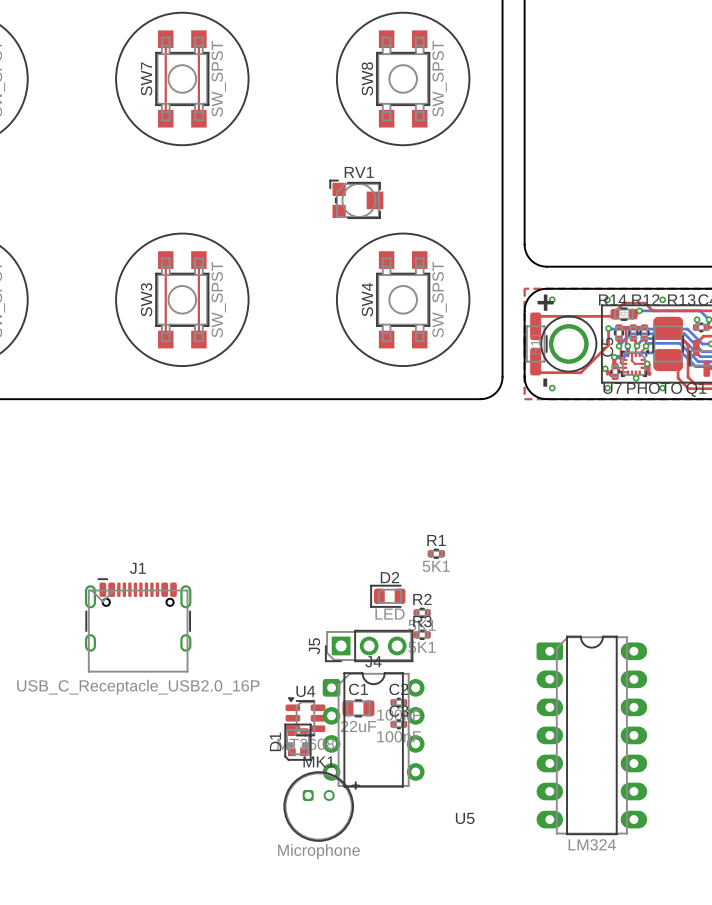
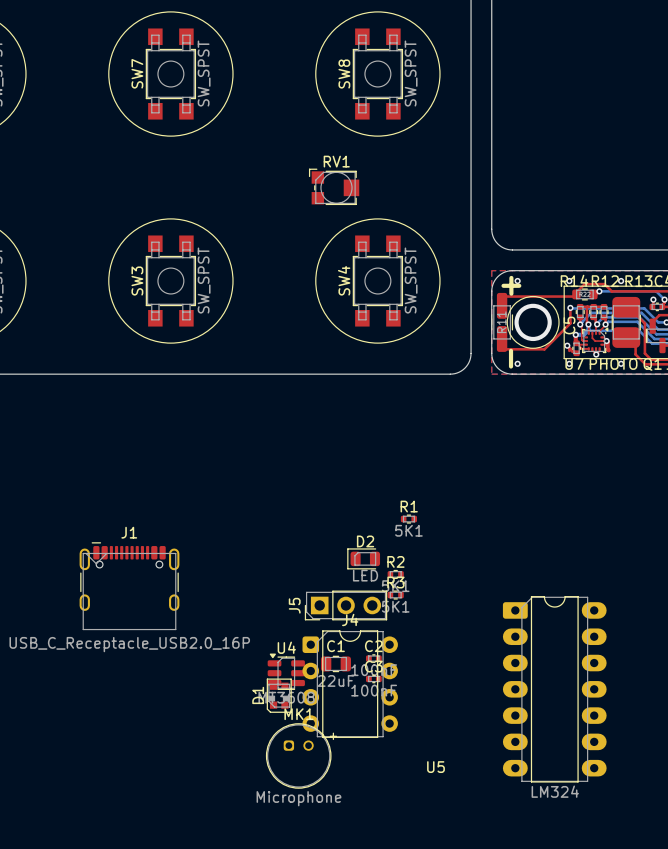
top track: (165, 39) (165, 118) -> none
top track: (198, 39) (198, 118) -> none
top track: (165, 260) (165, 339) -> none
top track: (198, 260) (198, 339) -> none

